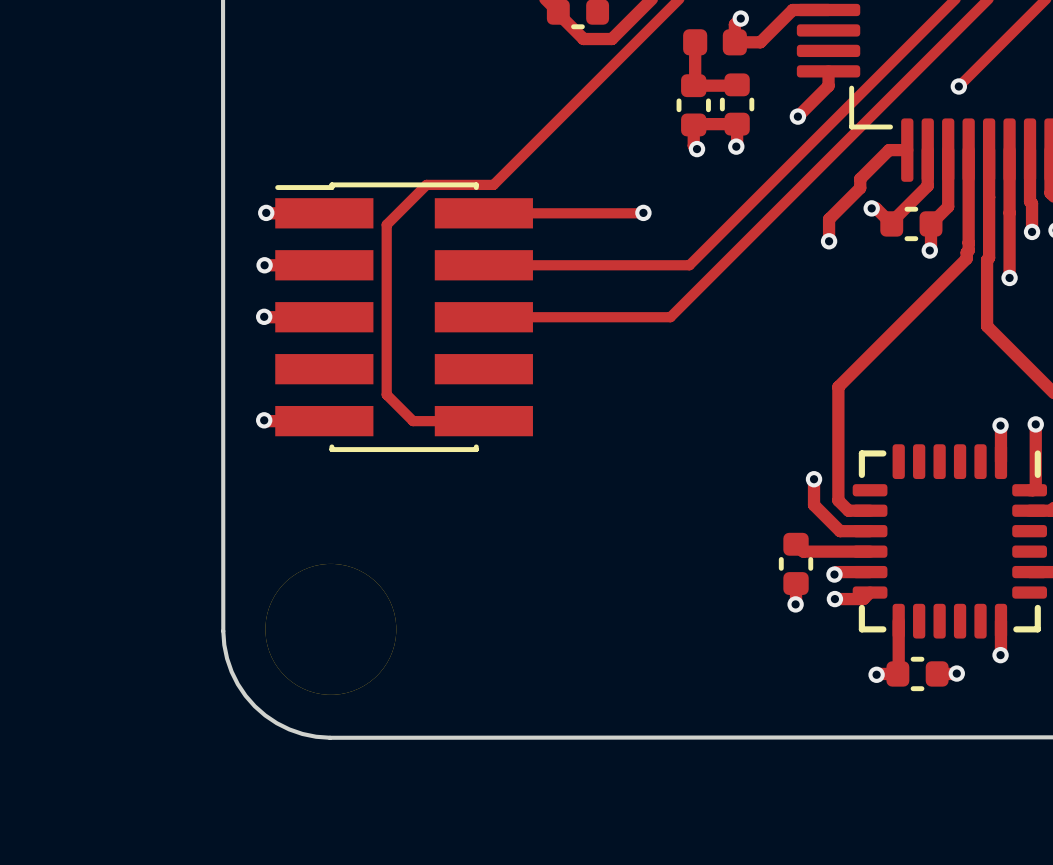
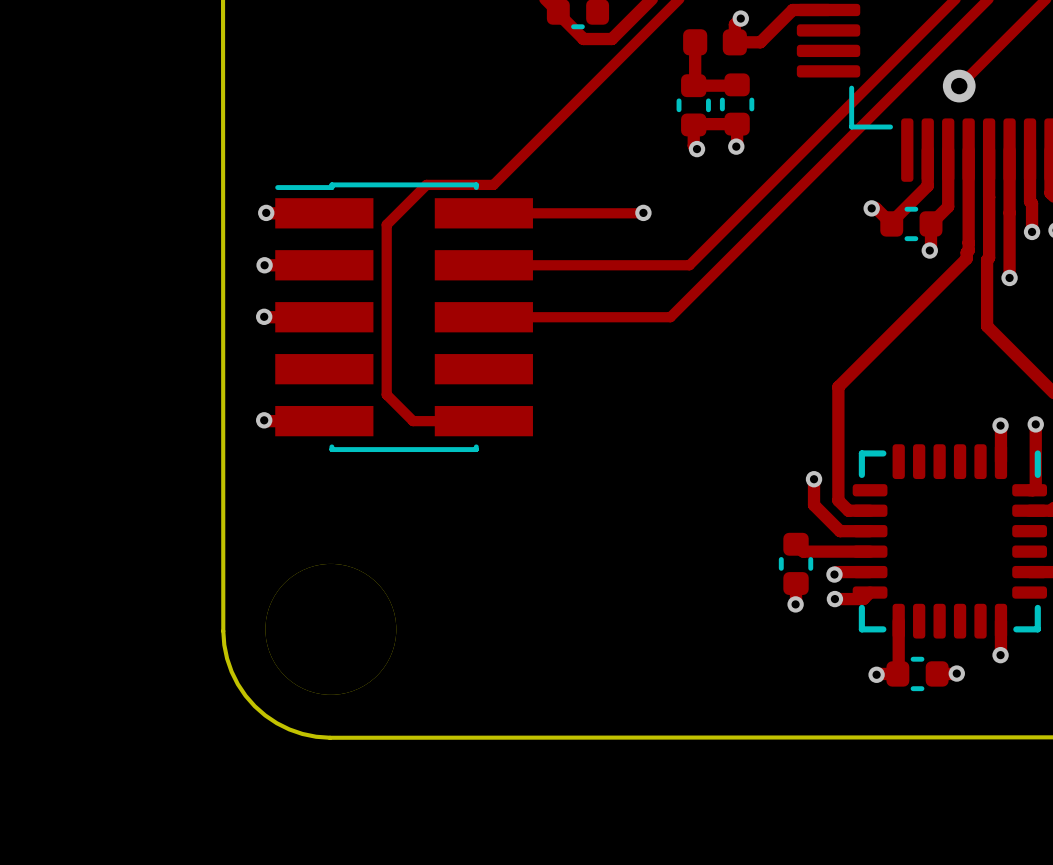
track: (828, 71) (828, 85) (797, 116) -> none
via size: [950, 78, 968, 95] -> [942, 69, 976, 103]
via: (797, 116) -> none
track: (907, 150) (889, 150) (860, 178) (860, 188) (829, 219) (829, 241) -> none
via: (829, 241) -> none

